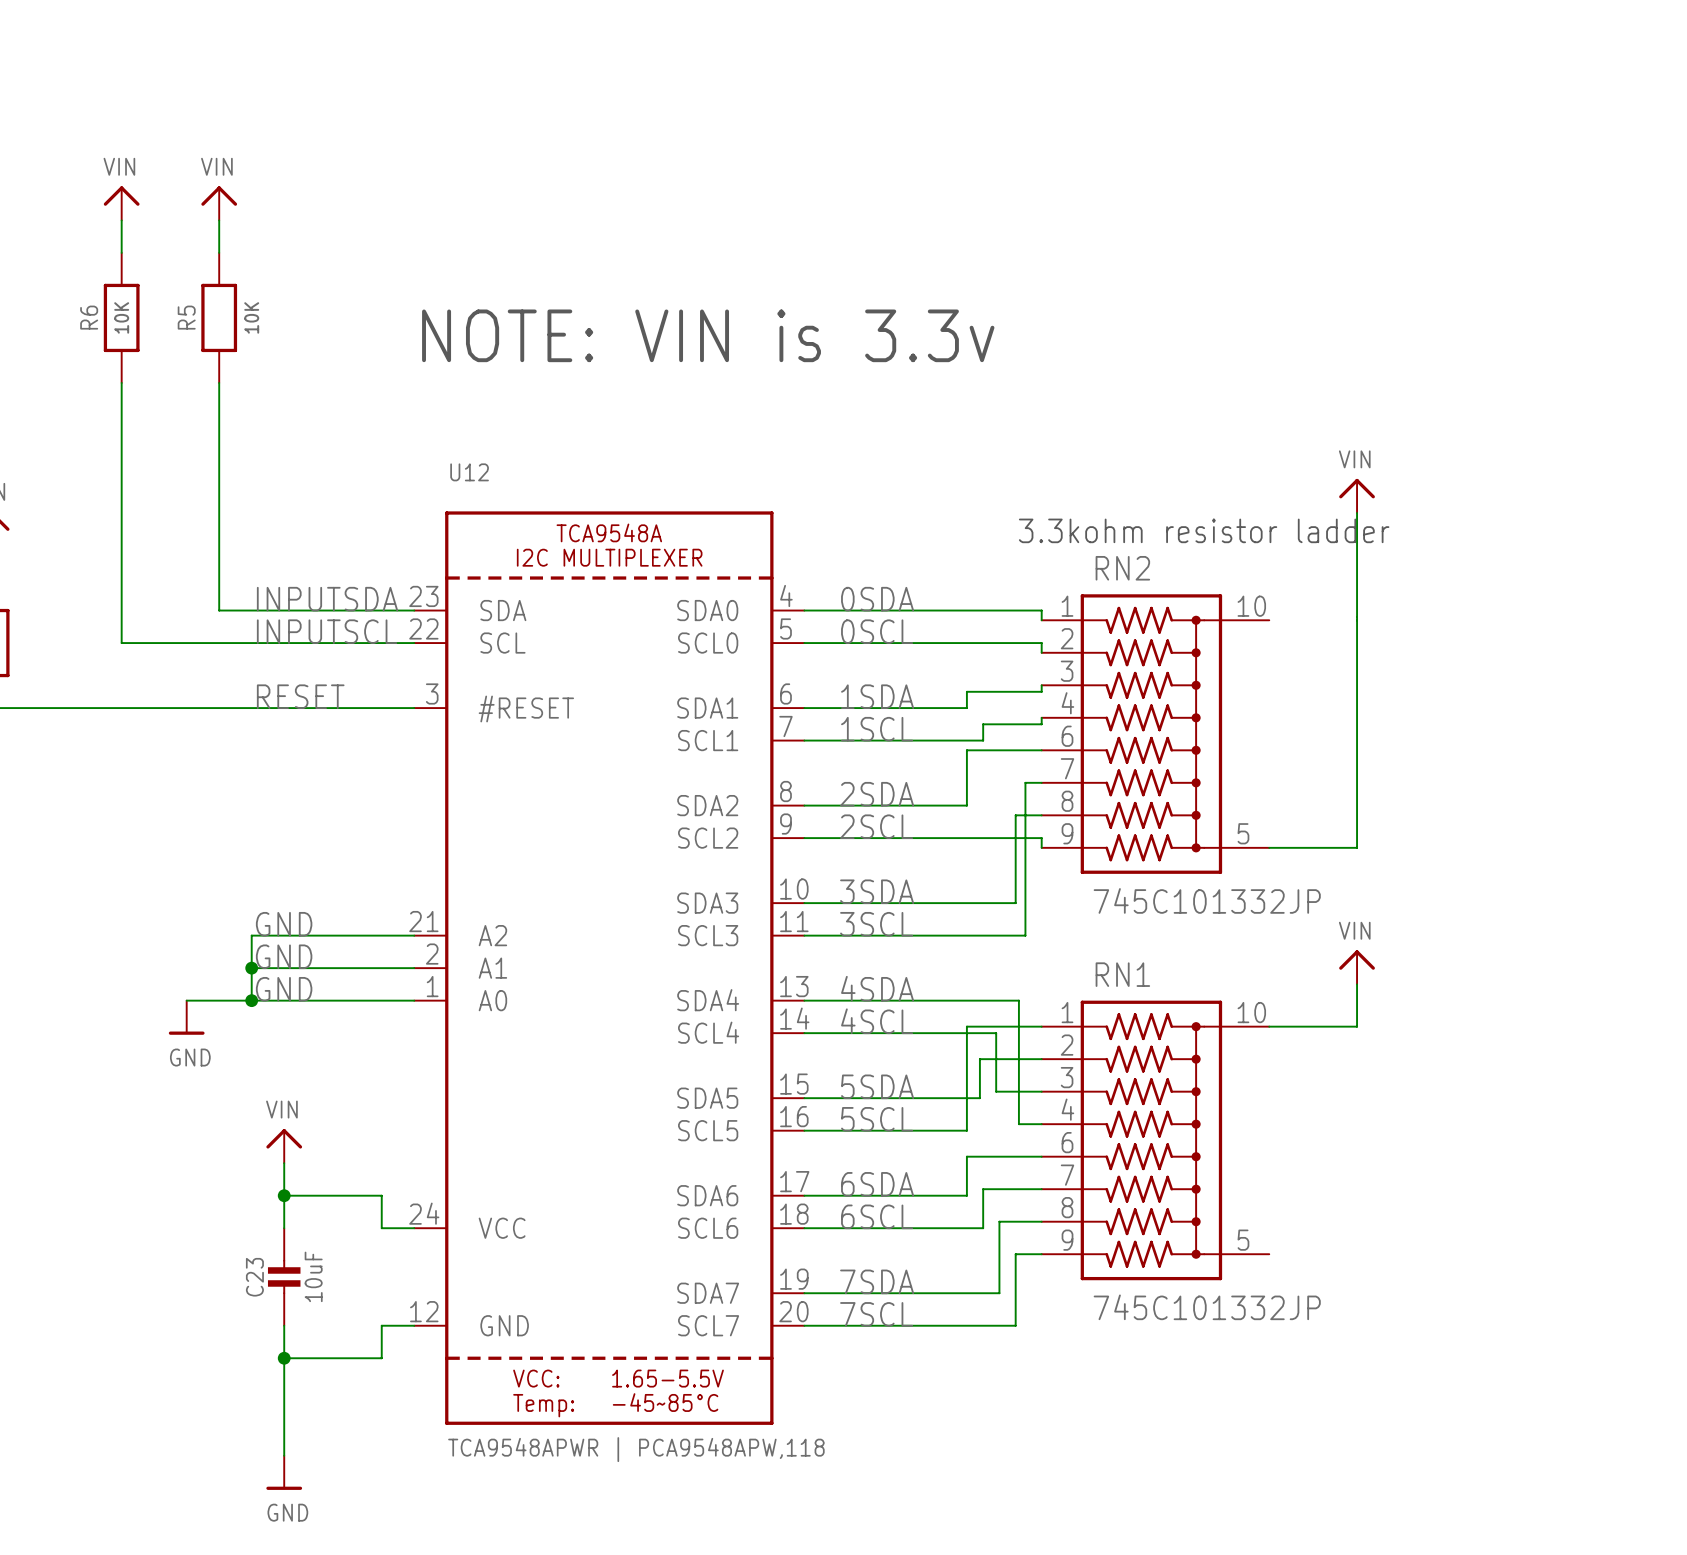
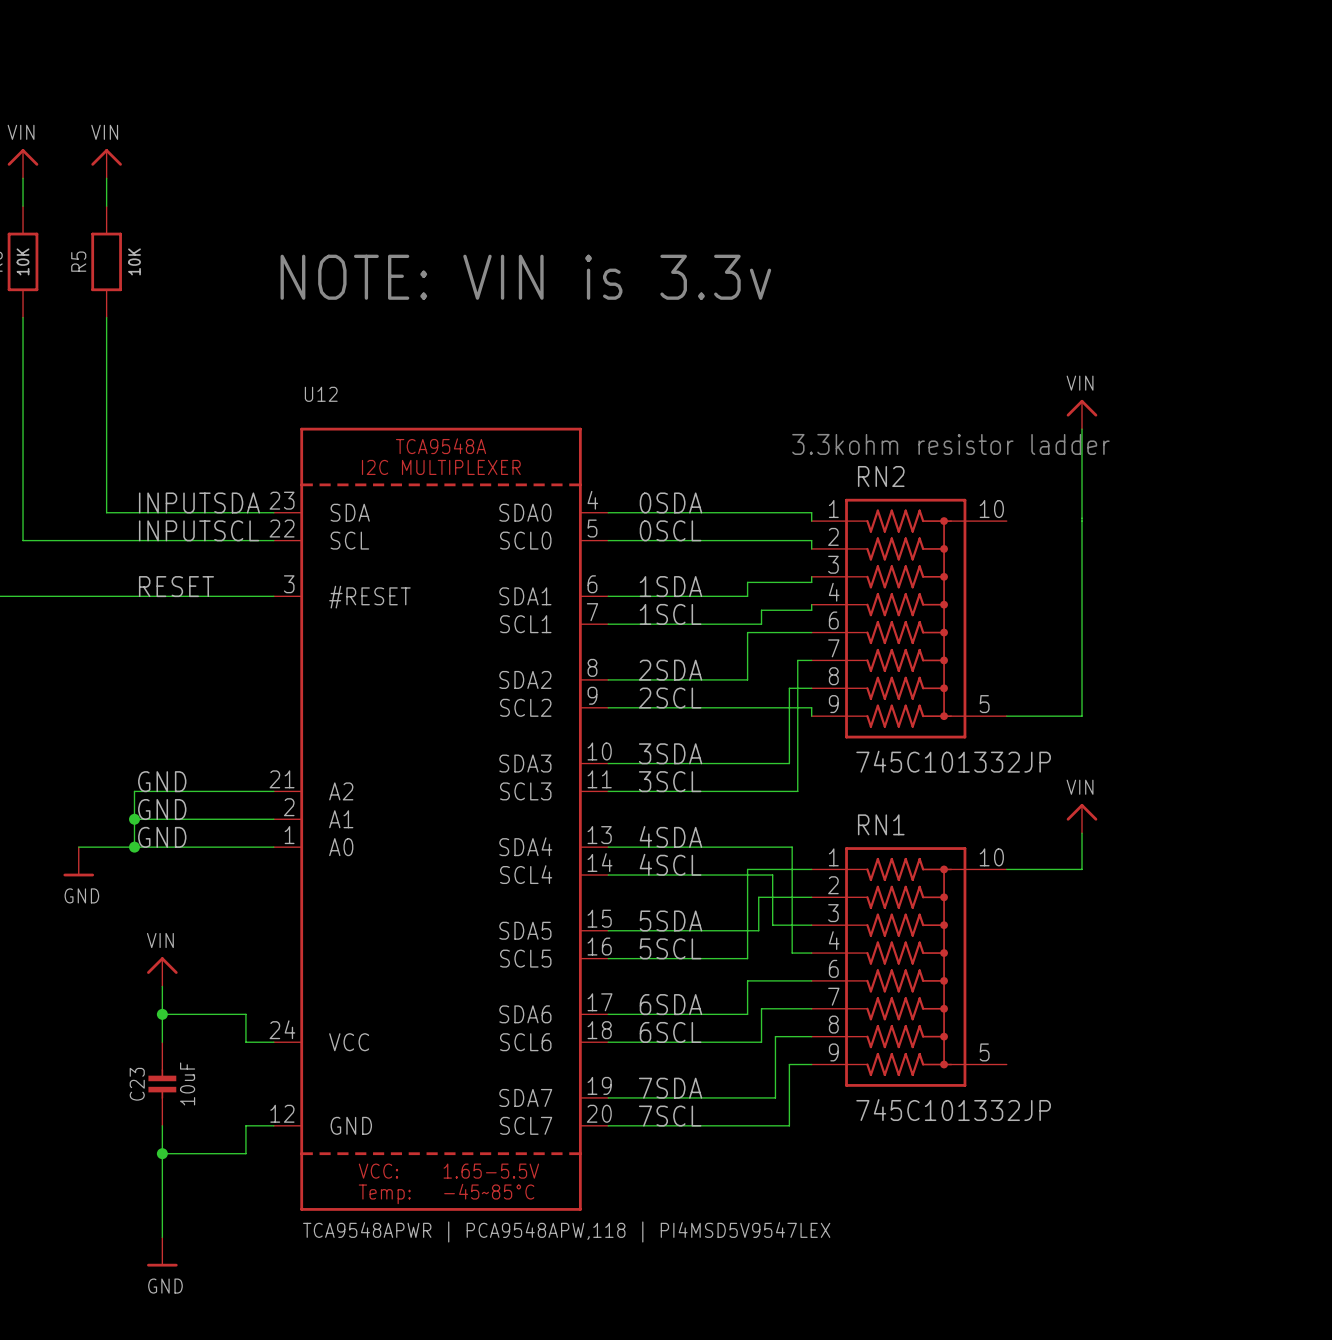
U12 value: TCA9548APWR | PCA9548APW,118 (636, 1449) -> TCA9548APWR | PCA9548APW,118 | PI4MSD5V9547LEX (566, 1231)

